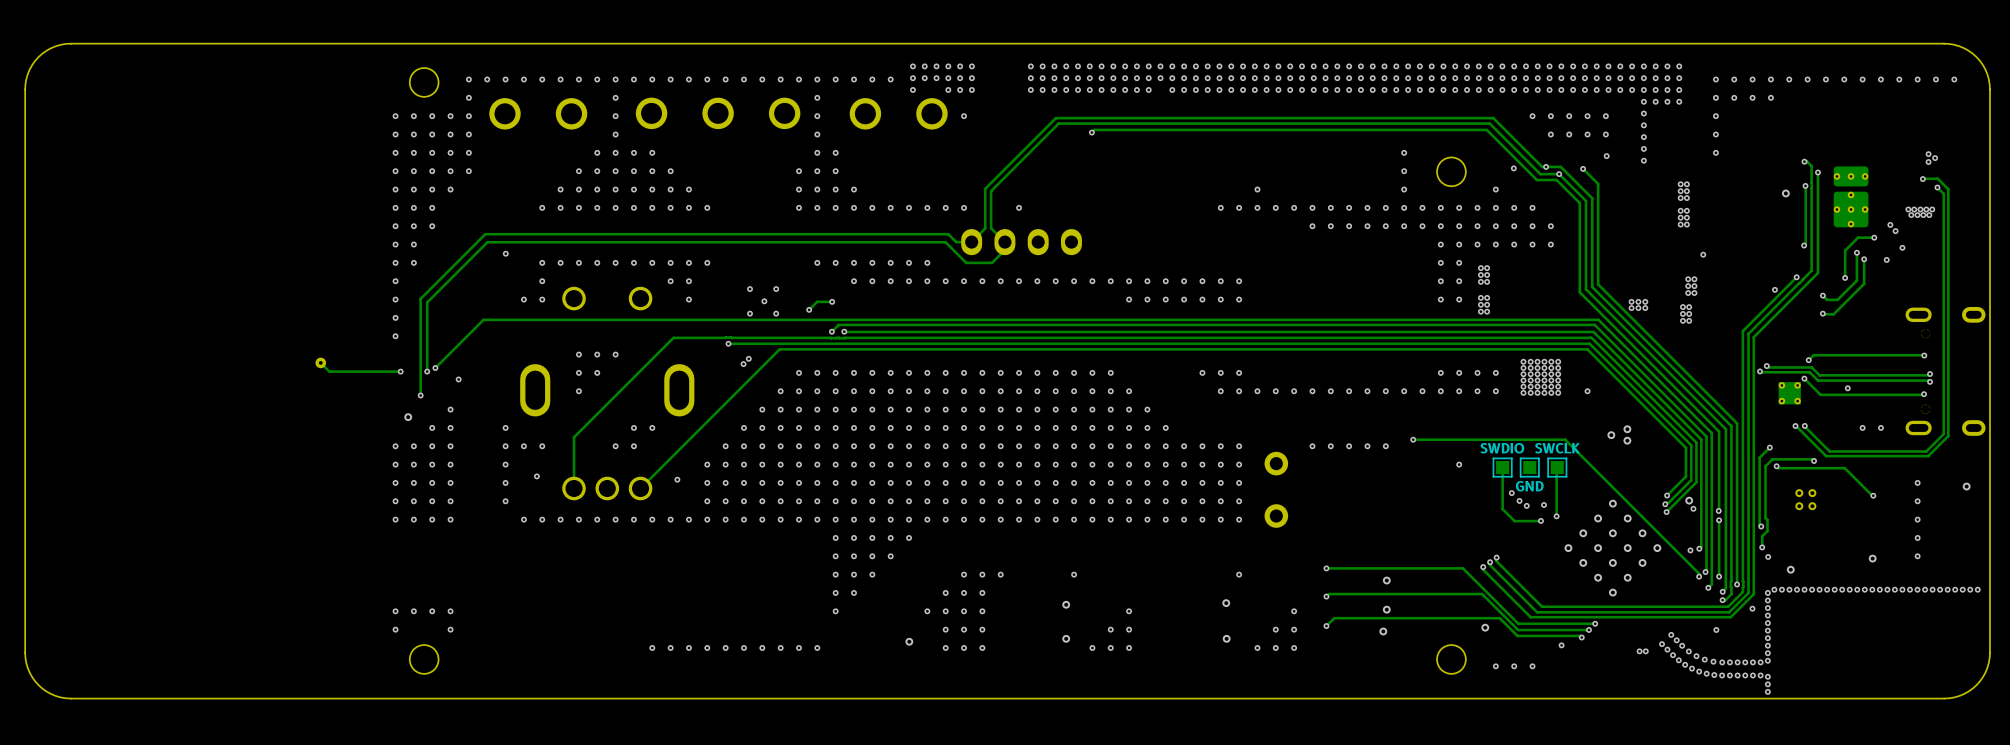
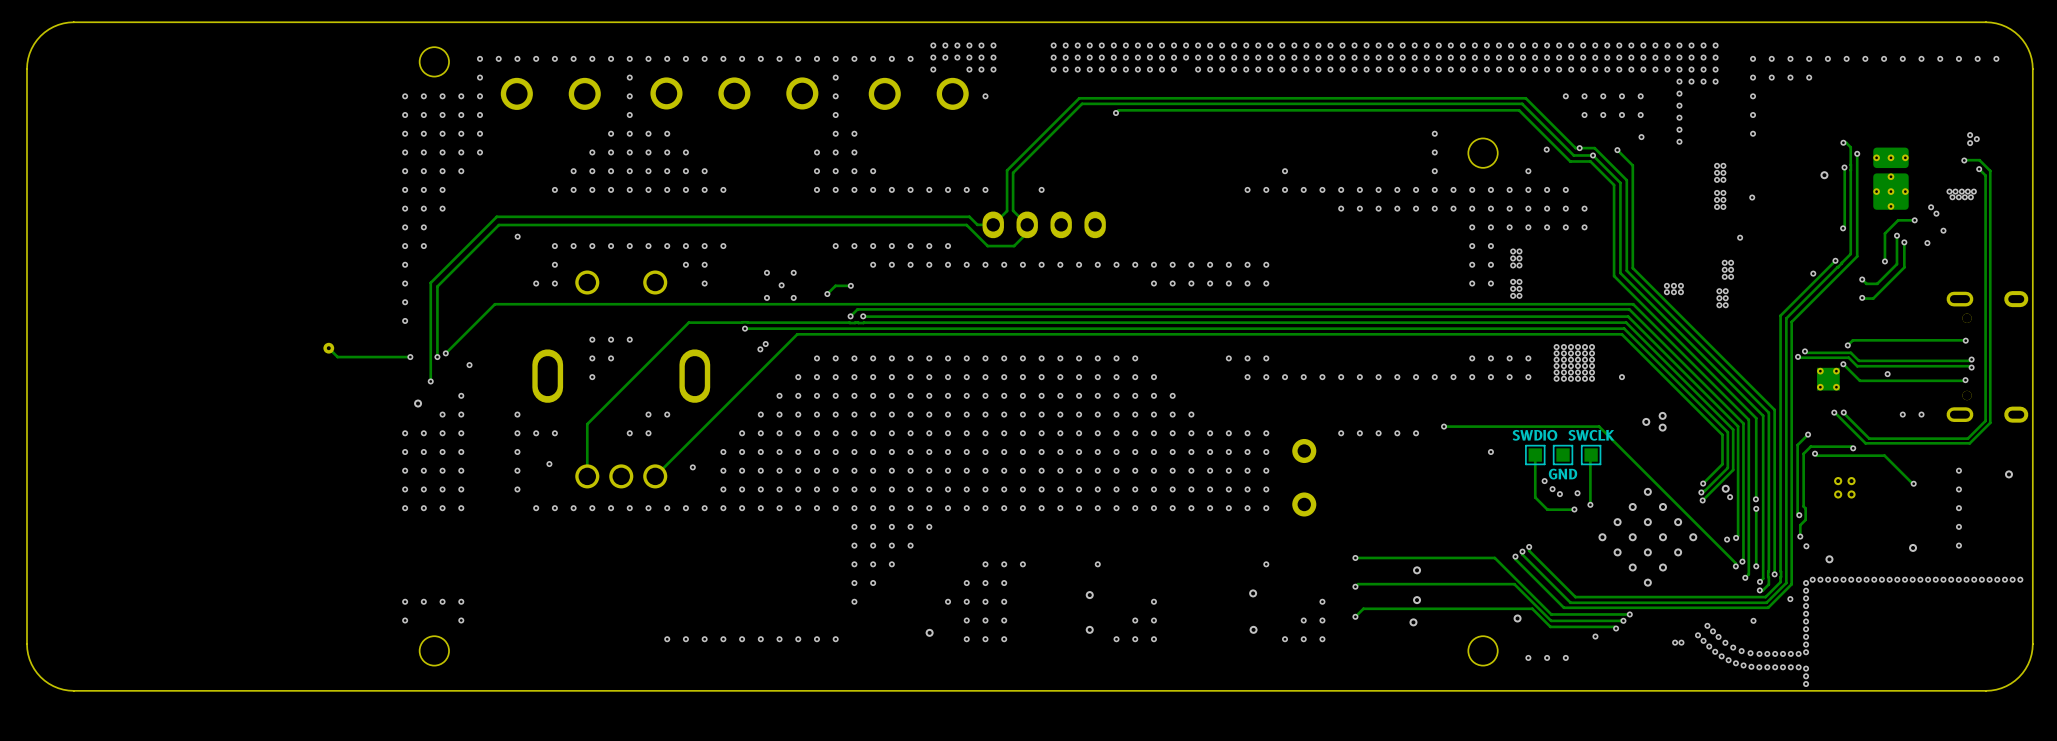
via: none -> (1752, 197)

